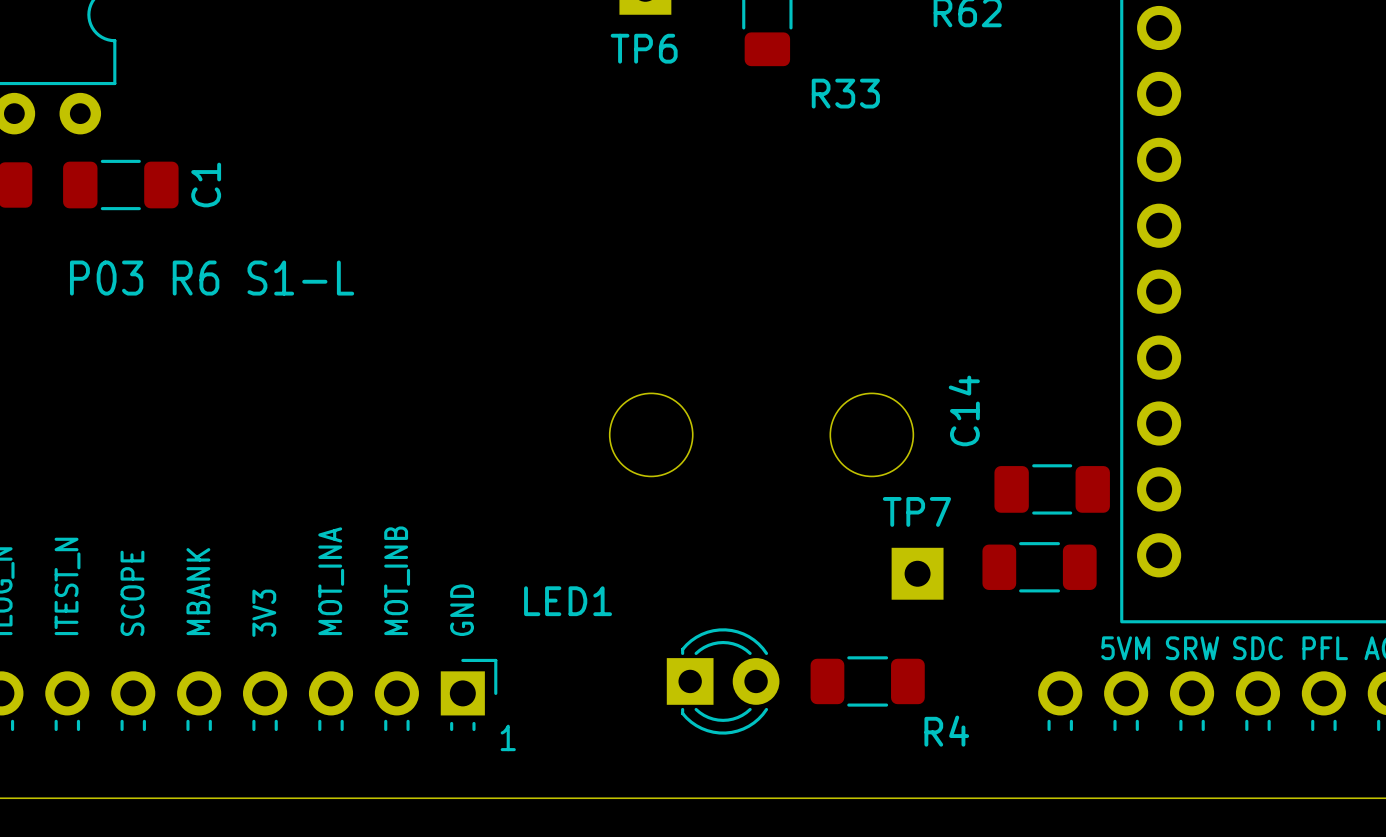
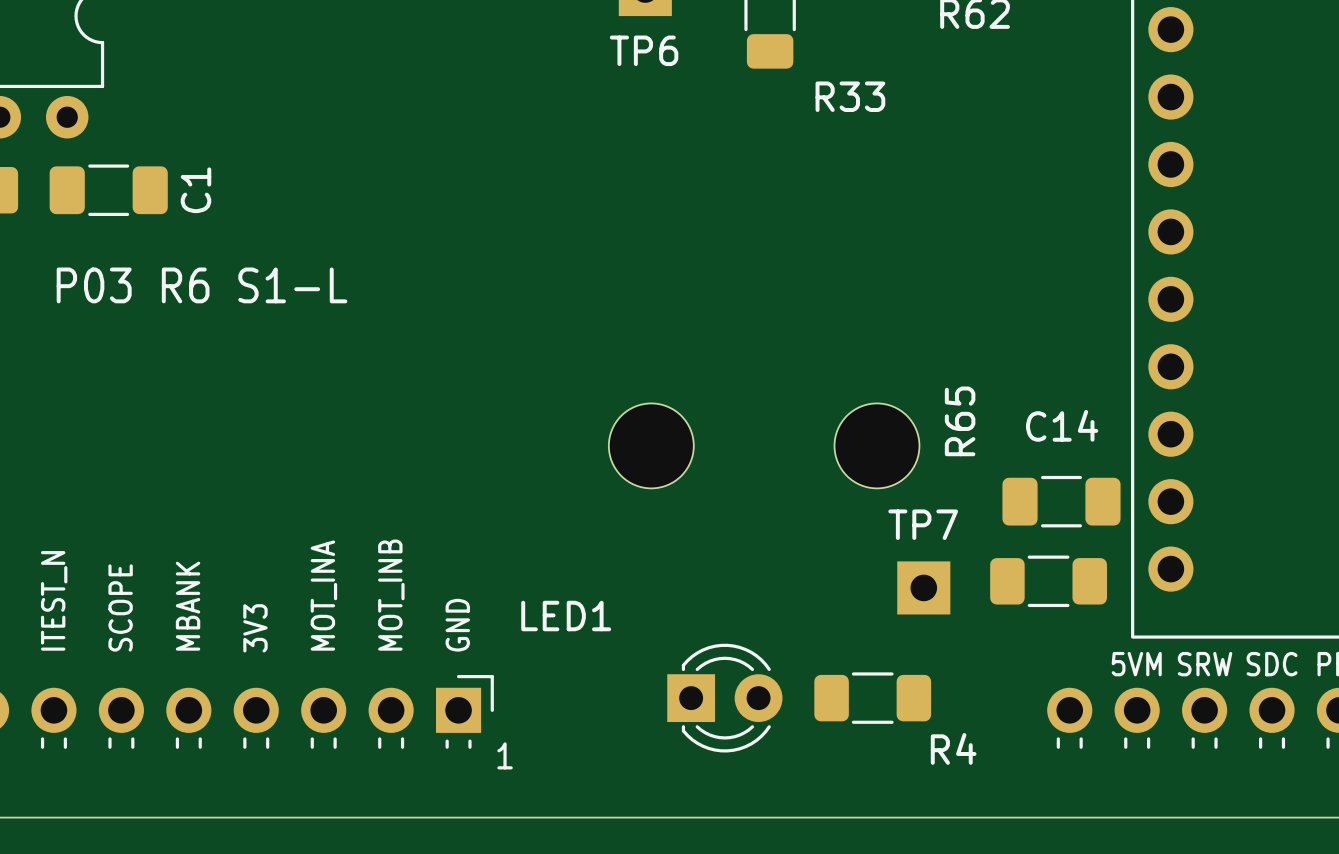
R65 name: none -> R65 (960, 421)
C14 name rotation: 0° (964, 410) -> 90° clockwise (1062, 425)

